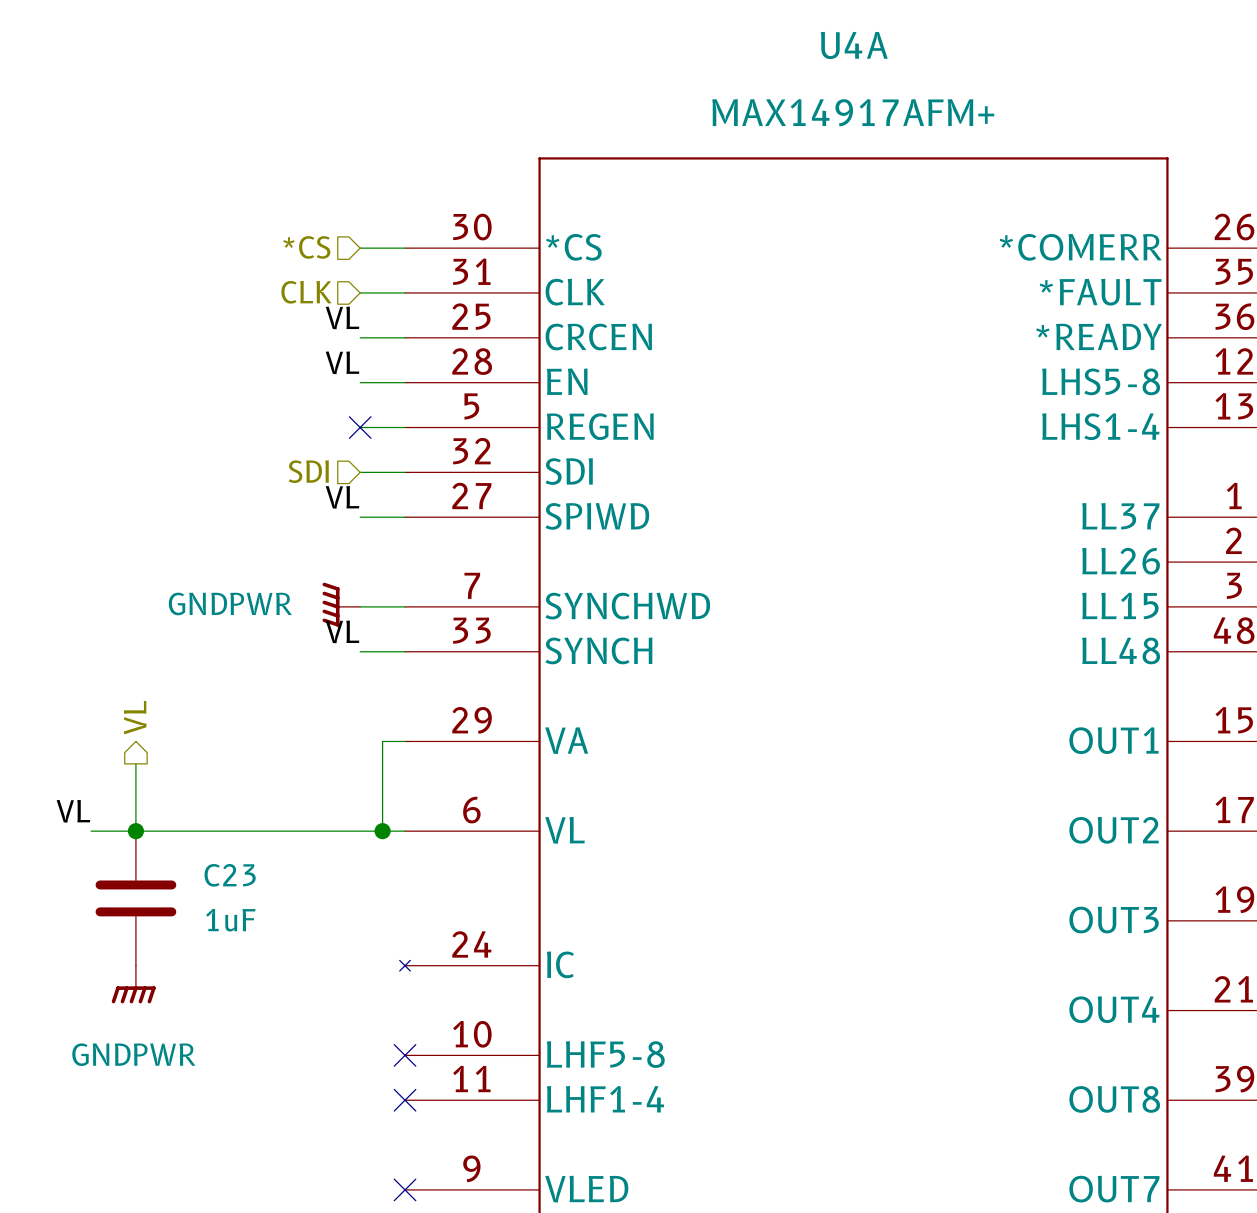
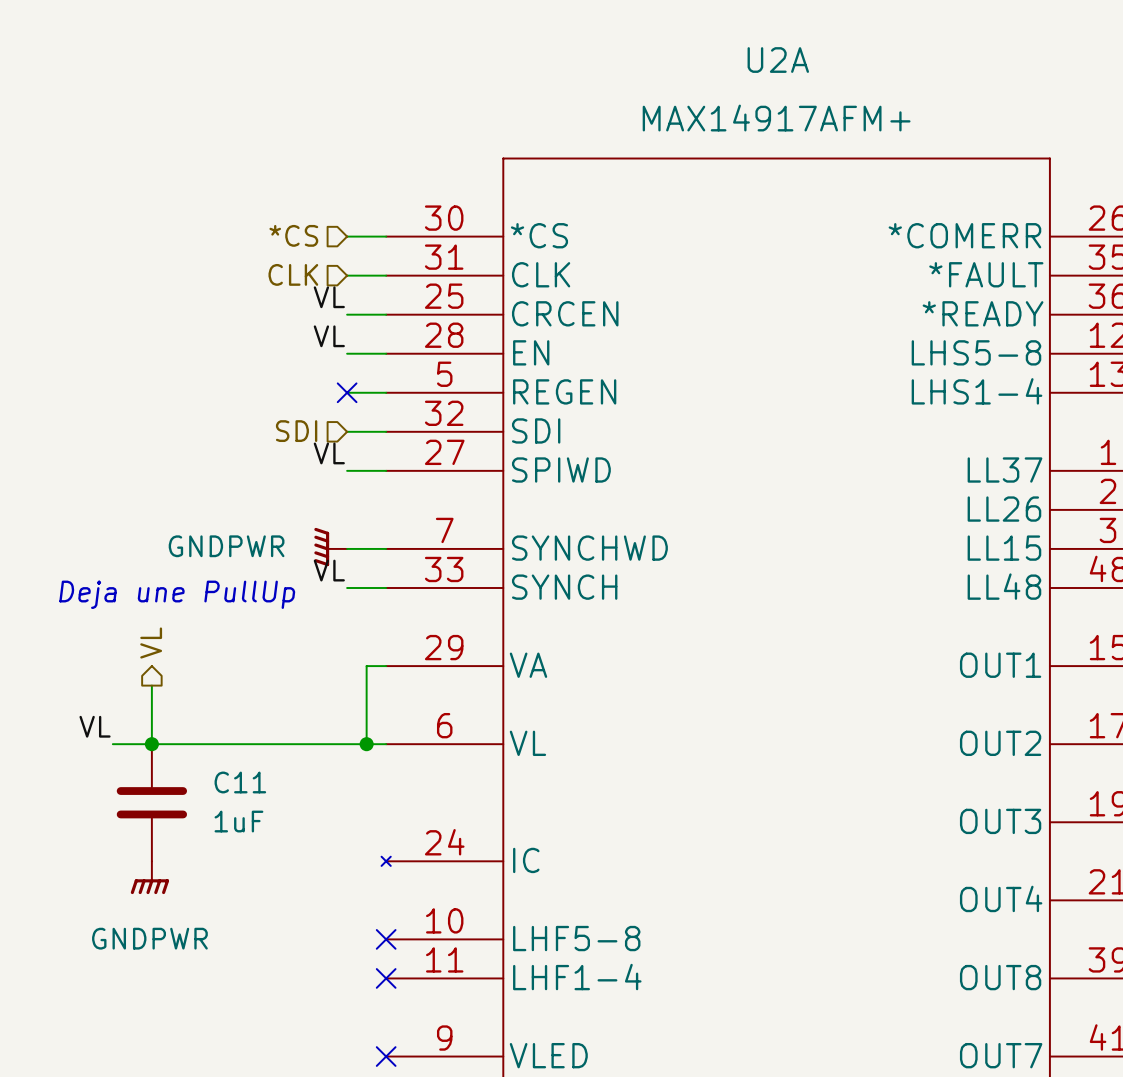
U4A name: U4A (854, 45) -> U2A (778, 60)
text: none -> Deja une PullUp (177, 594)
C23 name: C23 (230, 875) -> C11 (240, 782)

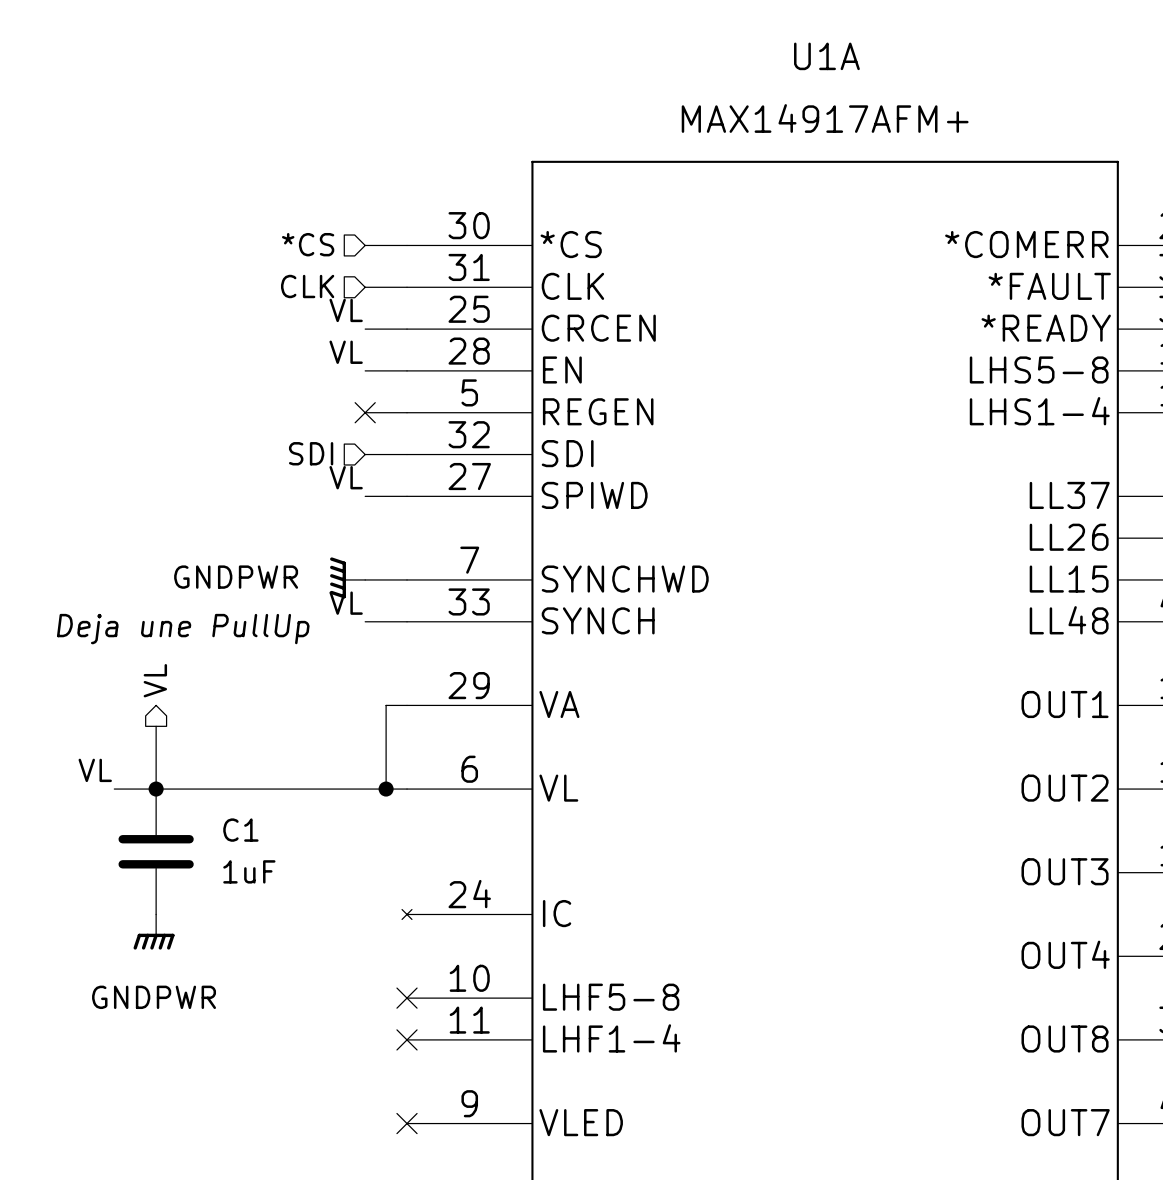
U2A name: U2A (778, 60) -> U1A (826, 56)
C11 name: C11 (240, 782) -> C1 (240, 830)

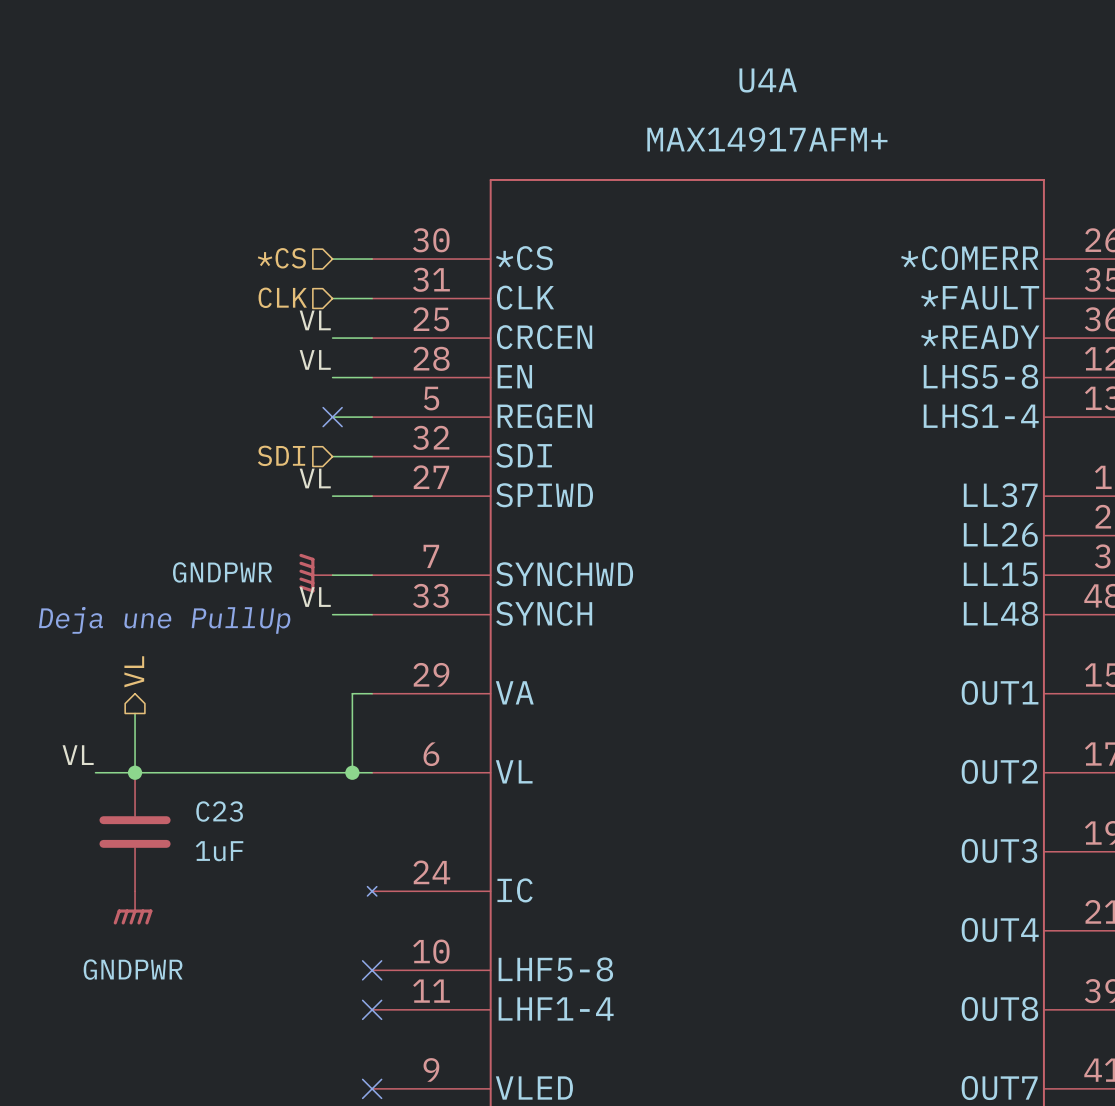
U1A name: U1A (826, 56) -> U4A (768, 80)
C1 name: C1 (240, 830) -> C23 (219, 811)

